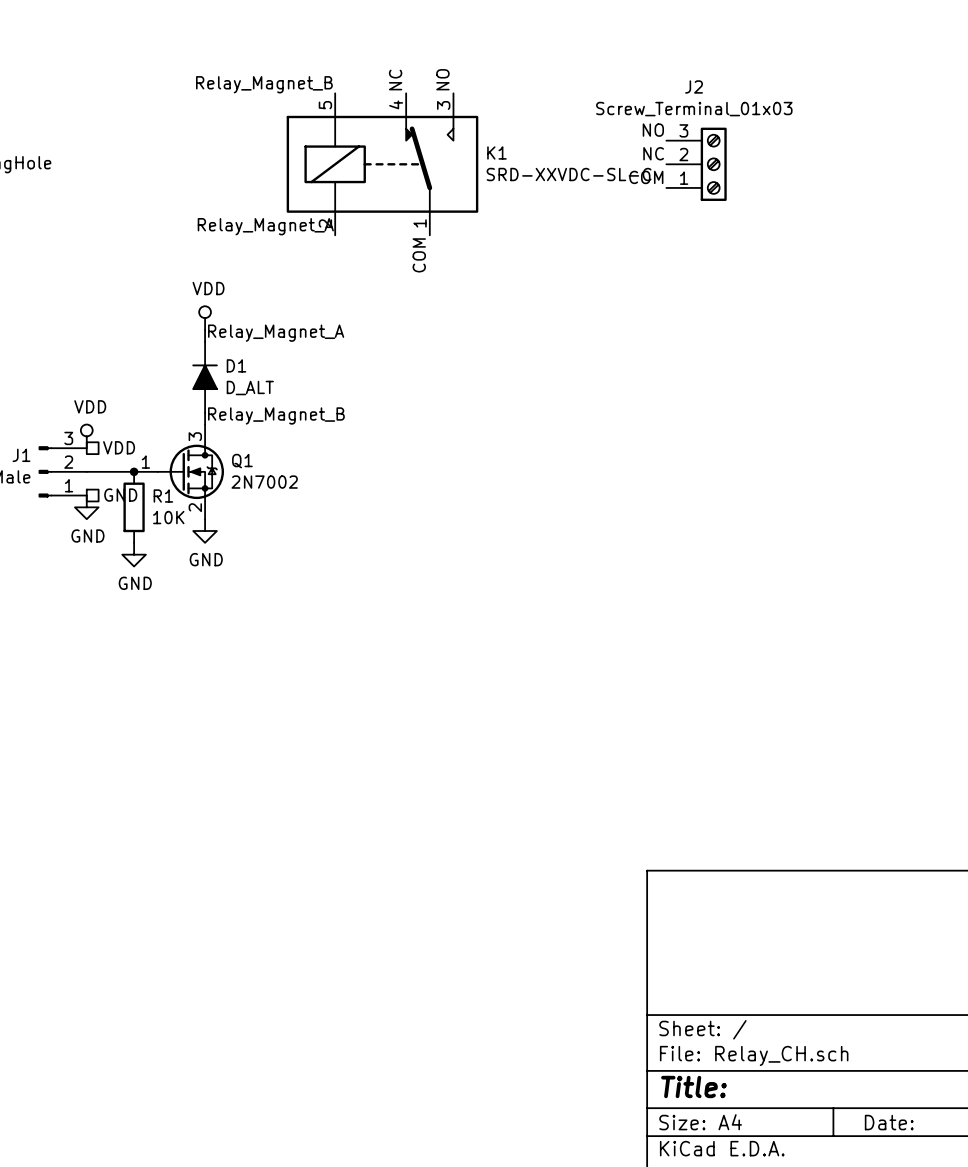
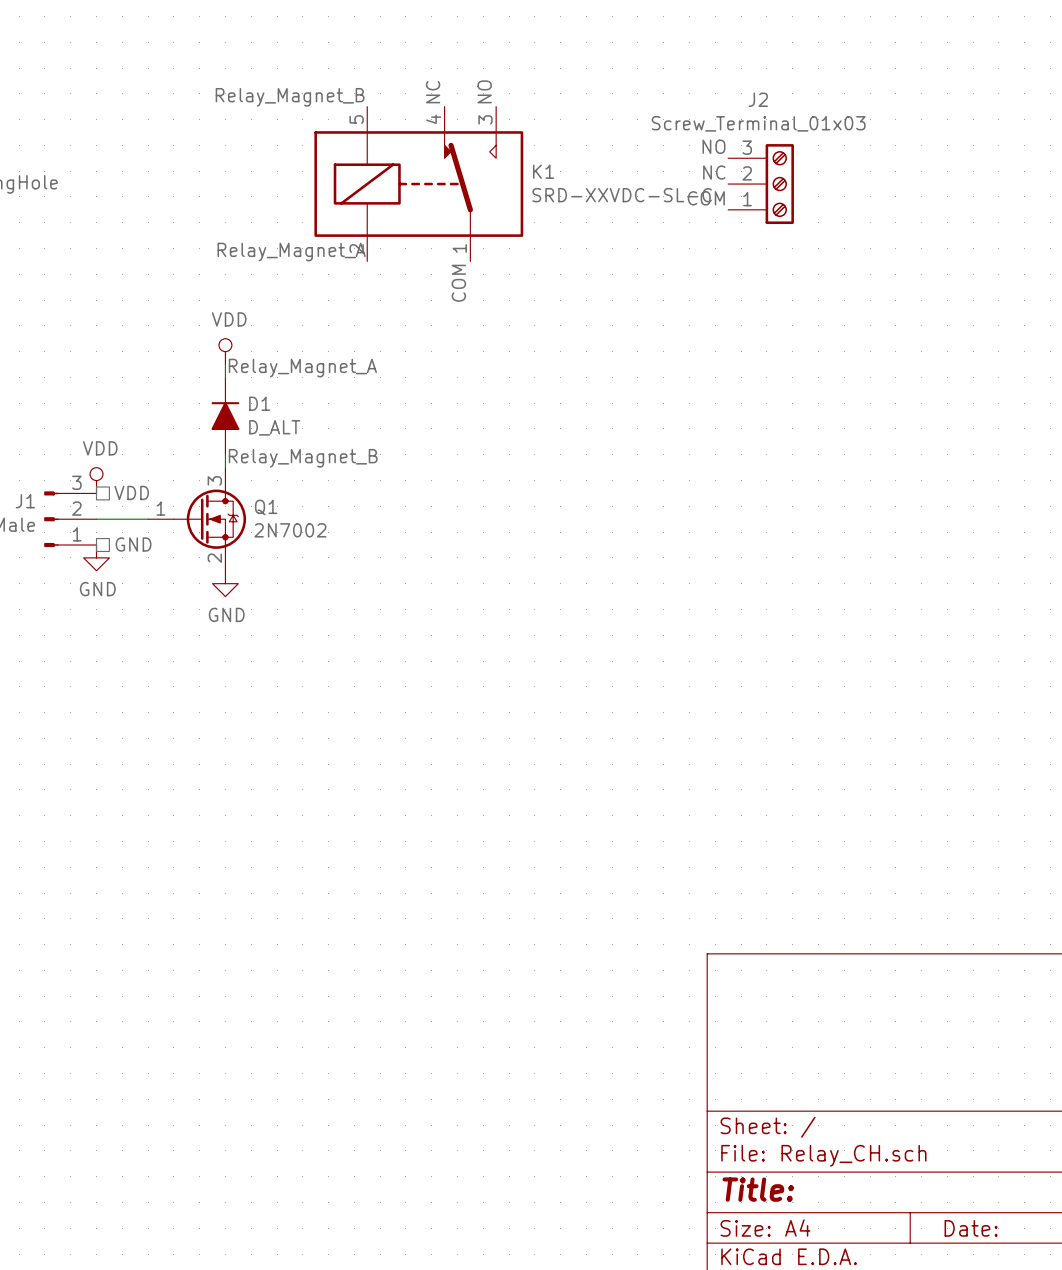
junction: (134, 471) -> none
R1: 10K (134, 507) -> none
power symbol: GND (134, 554) -> none

